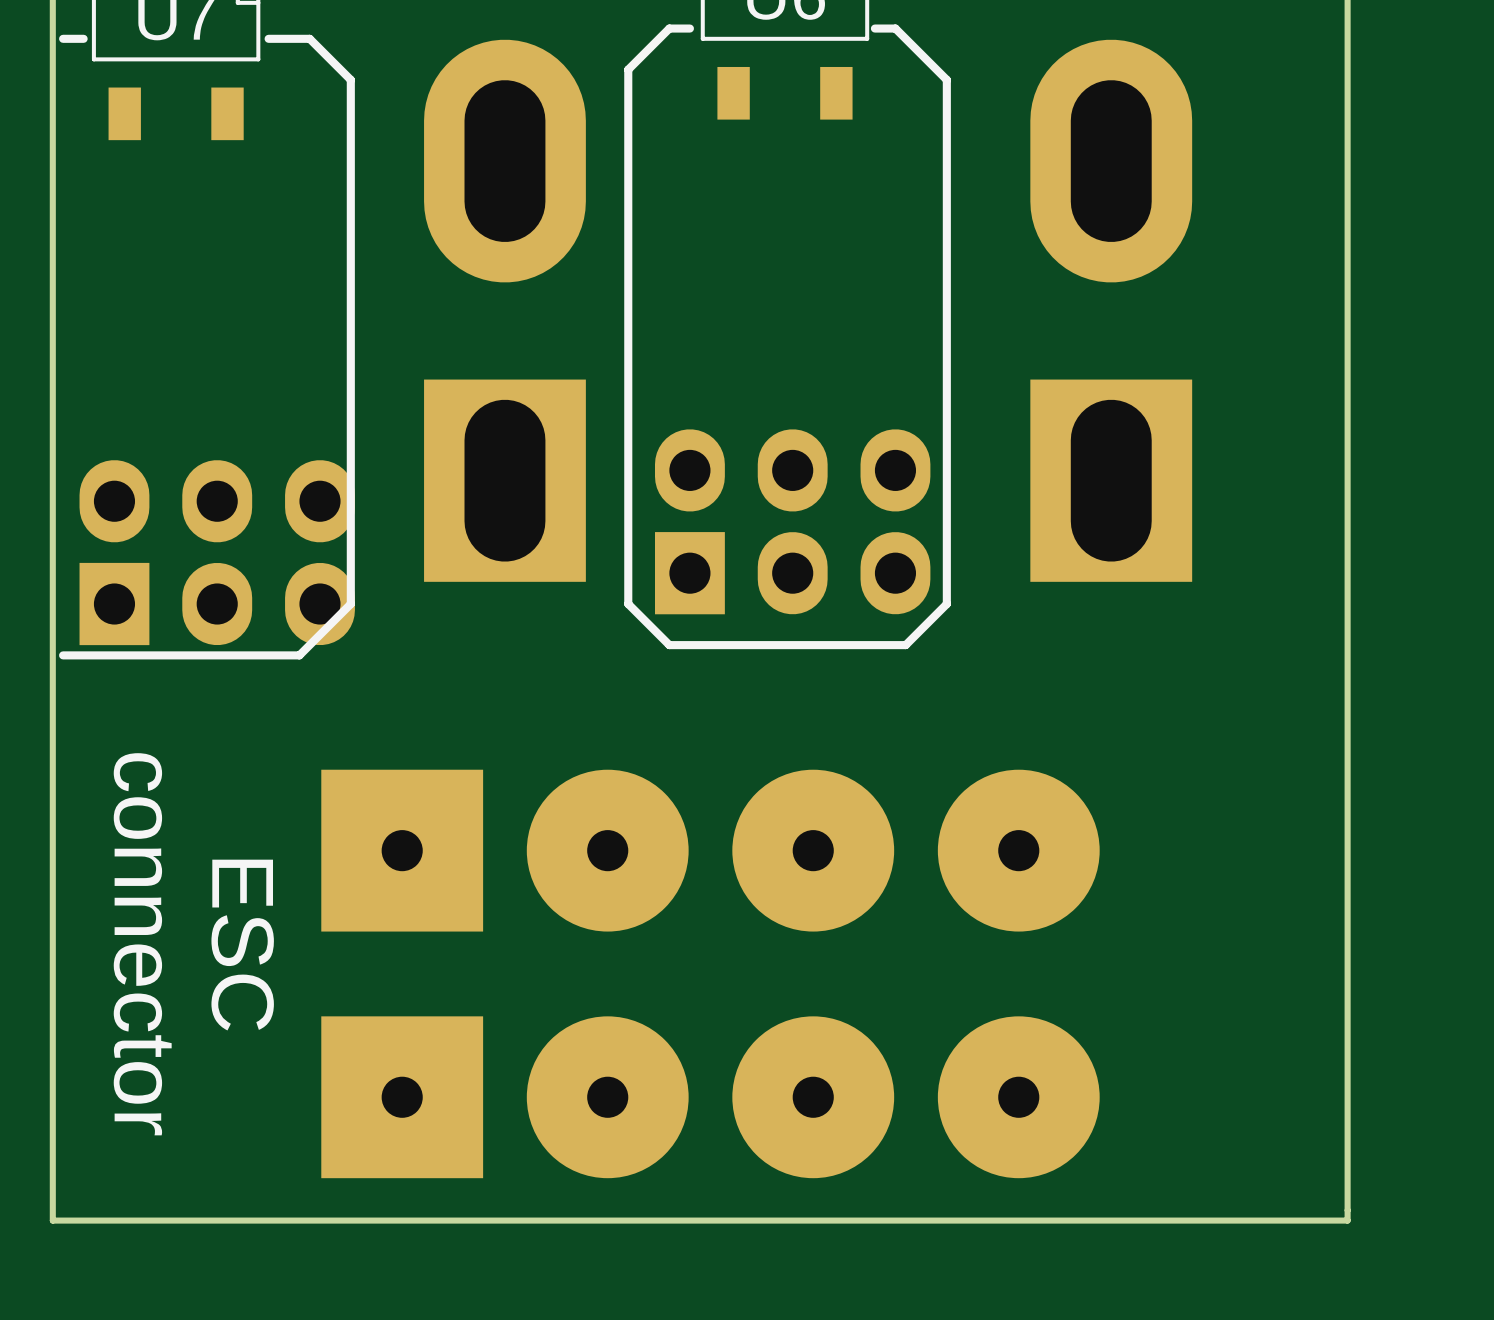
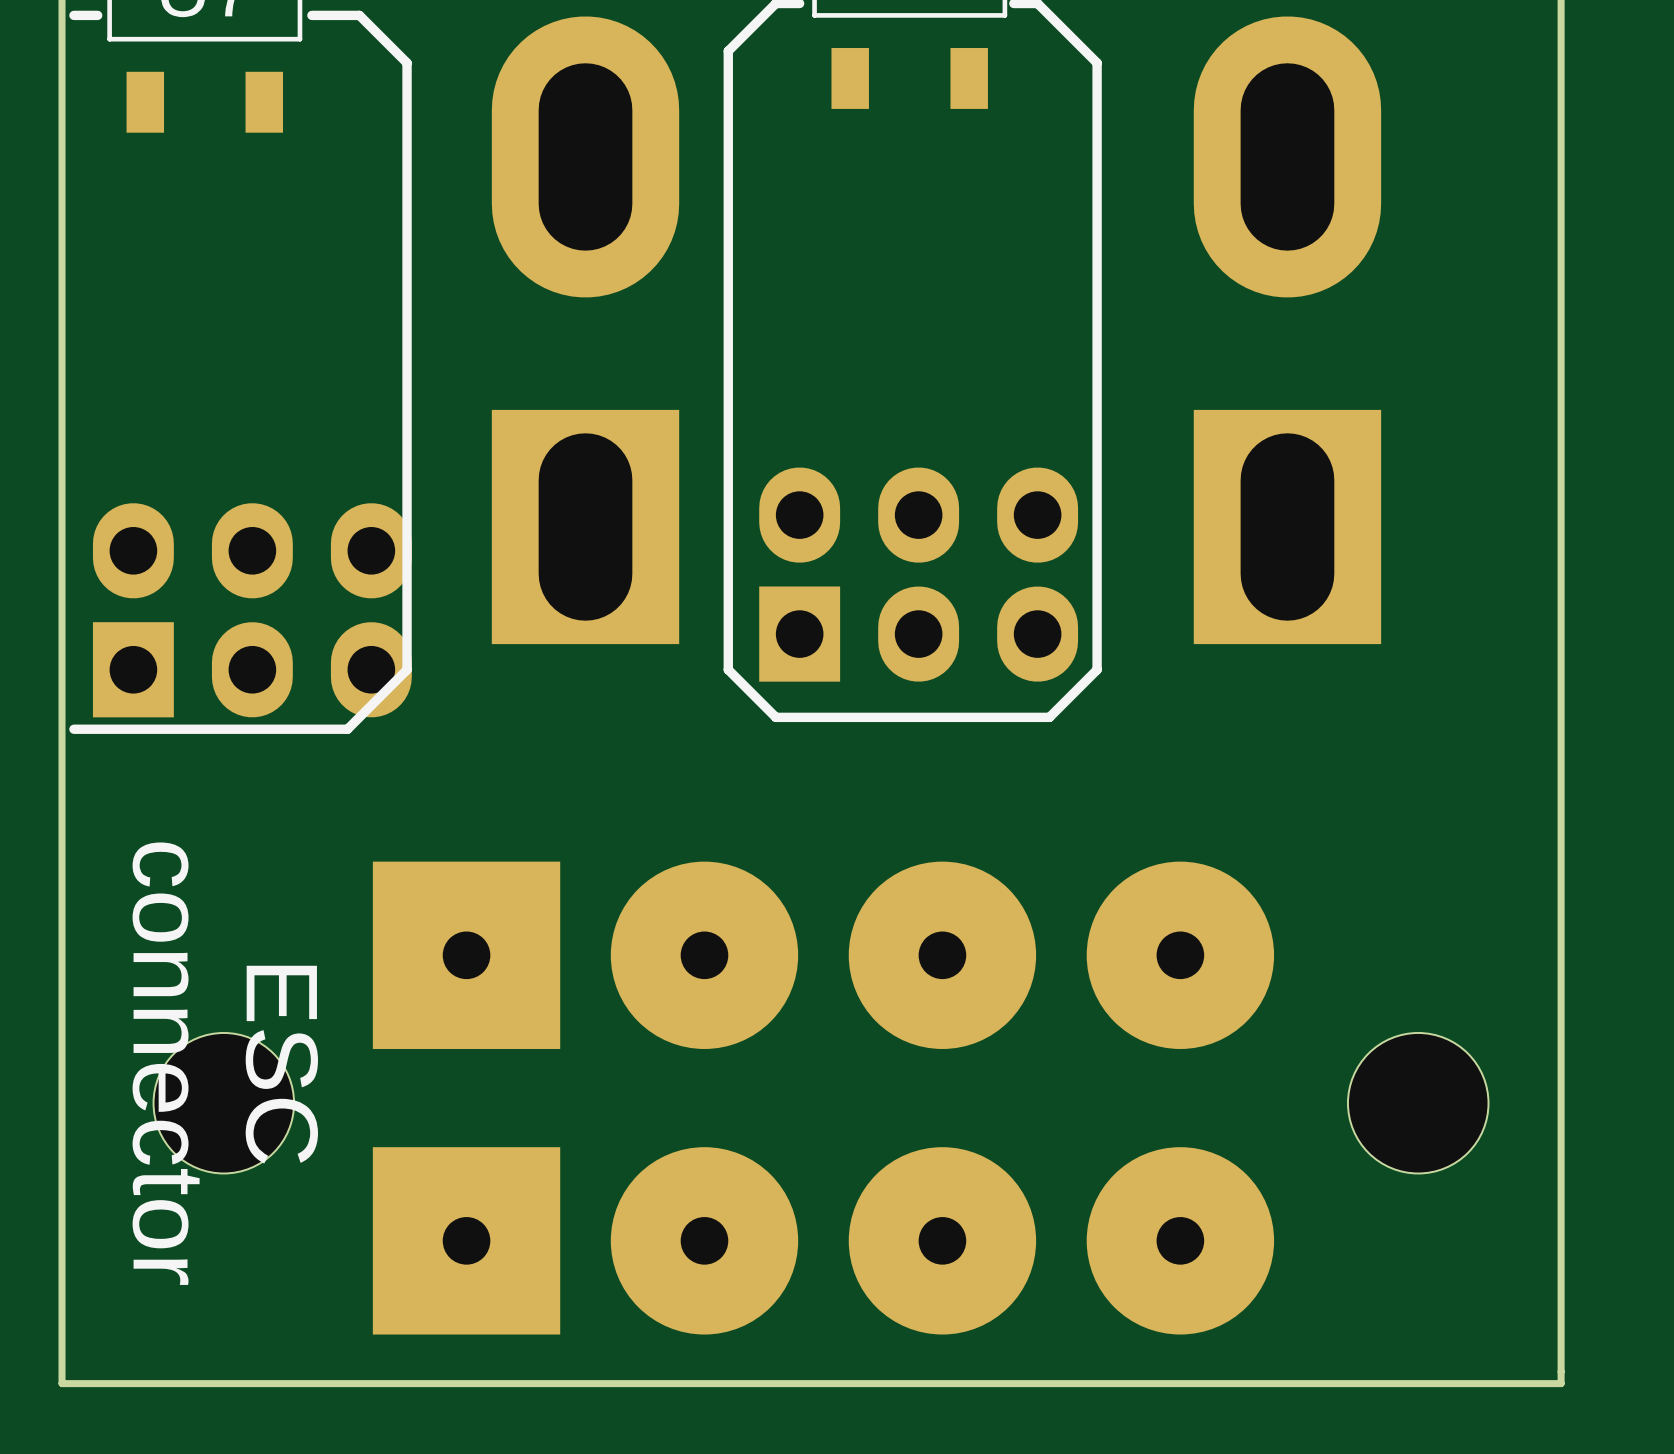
part: none -> (223, 1103)
part: none -> (1418, 1103)

